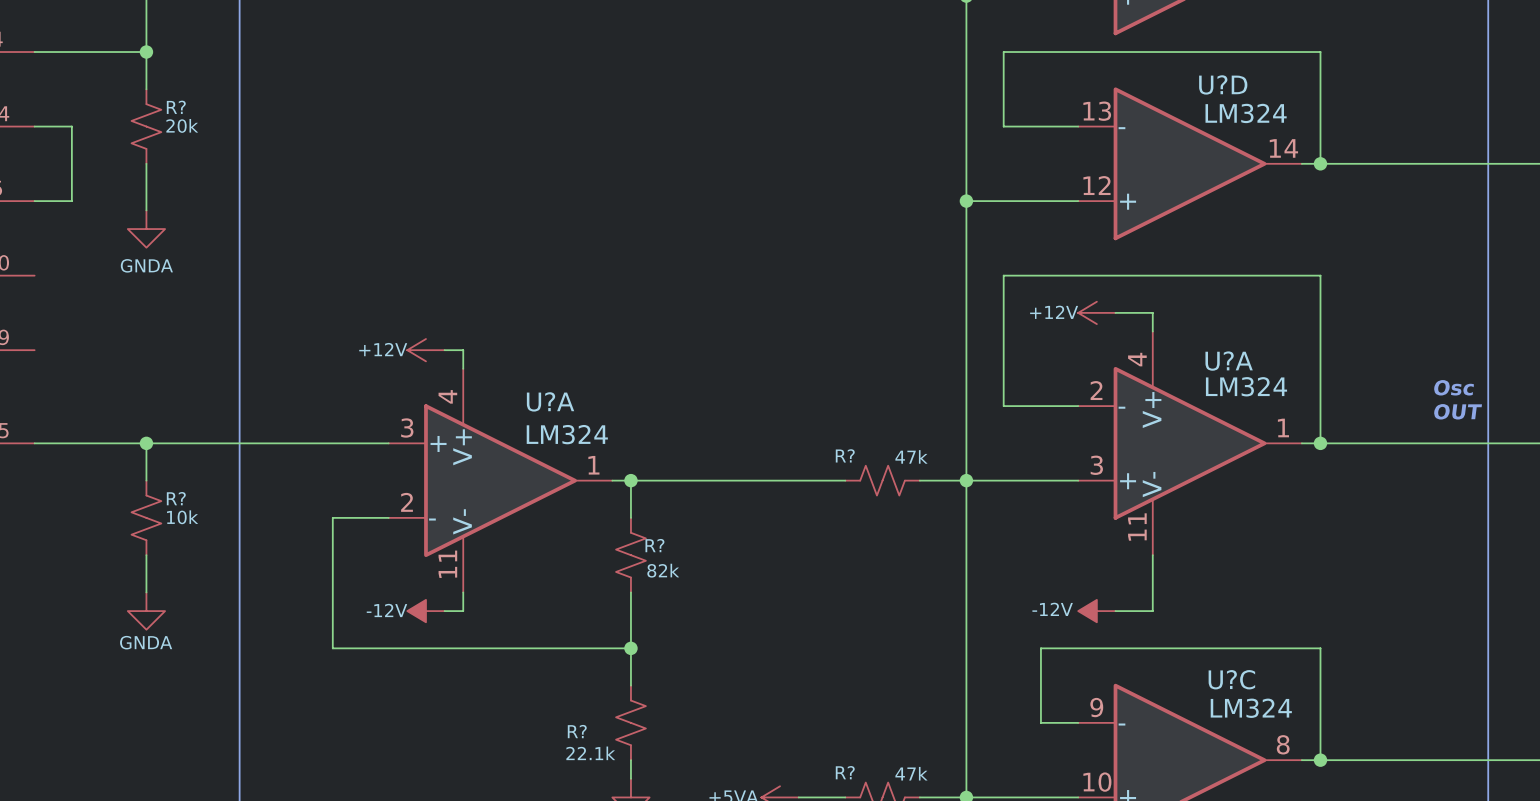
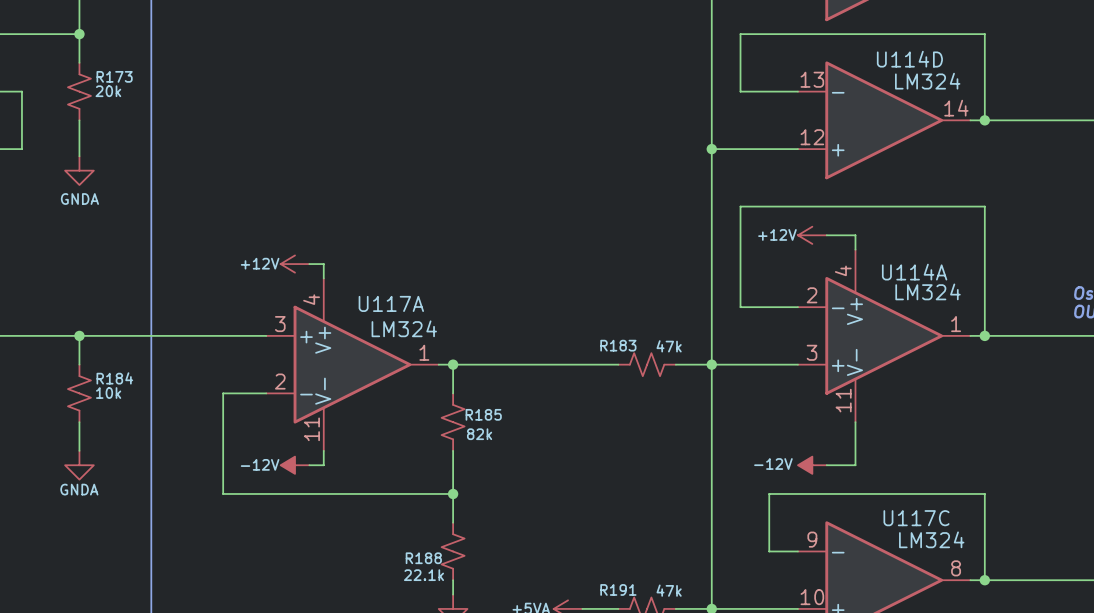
U?D name: U?D (1223, 84) -> U114D (909, 59)
R? name: R? (176, 107) -> R173 (114, 76)
U?A name: U?A (1229, 361) -> U114A (914, 272)
U?A name: U?A (550, 401) -> U117A (391, 303)
R? name: R? (845, 455) -> R183 (618, 345)
R? name: R? (176, 498) -> R184 (114, 378)
R? name: R? (654, 545) -> R185 (483, 414)
U?C name: U?C (1231, 679) -> U117C (916, 518)
R? name: R? (577, 731) -> R188 (423, 558)
R? name: R? (845, 772) -> R191 (618, 589)

